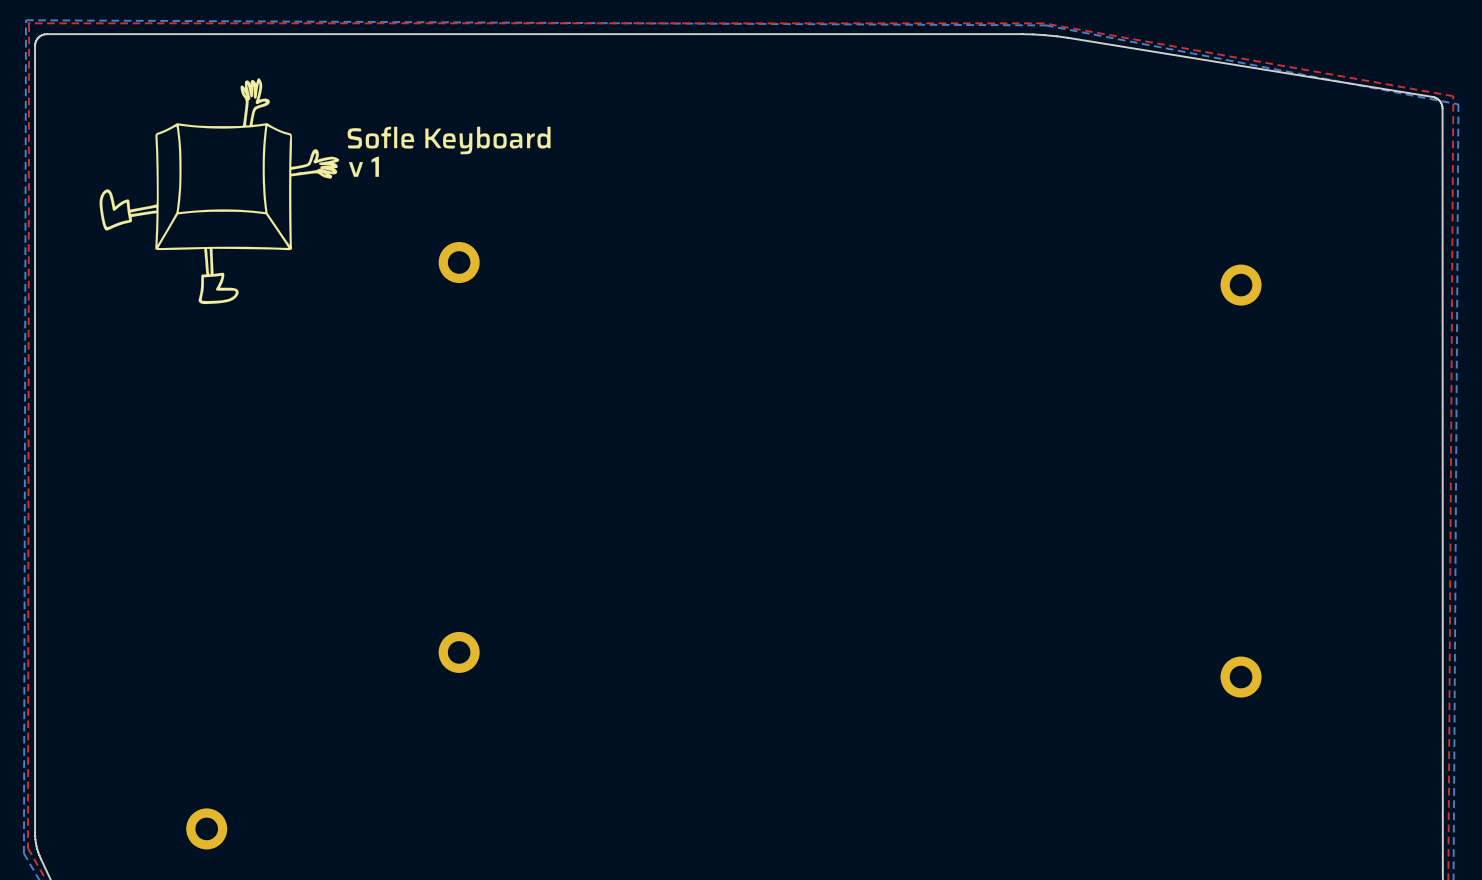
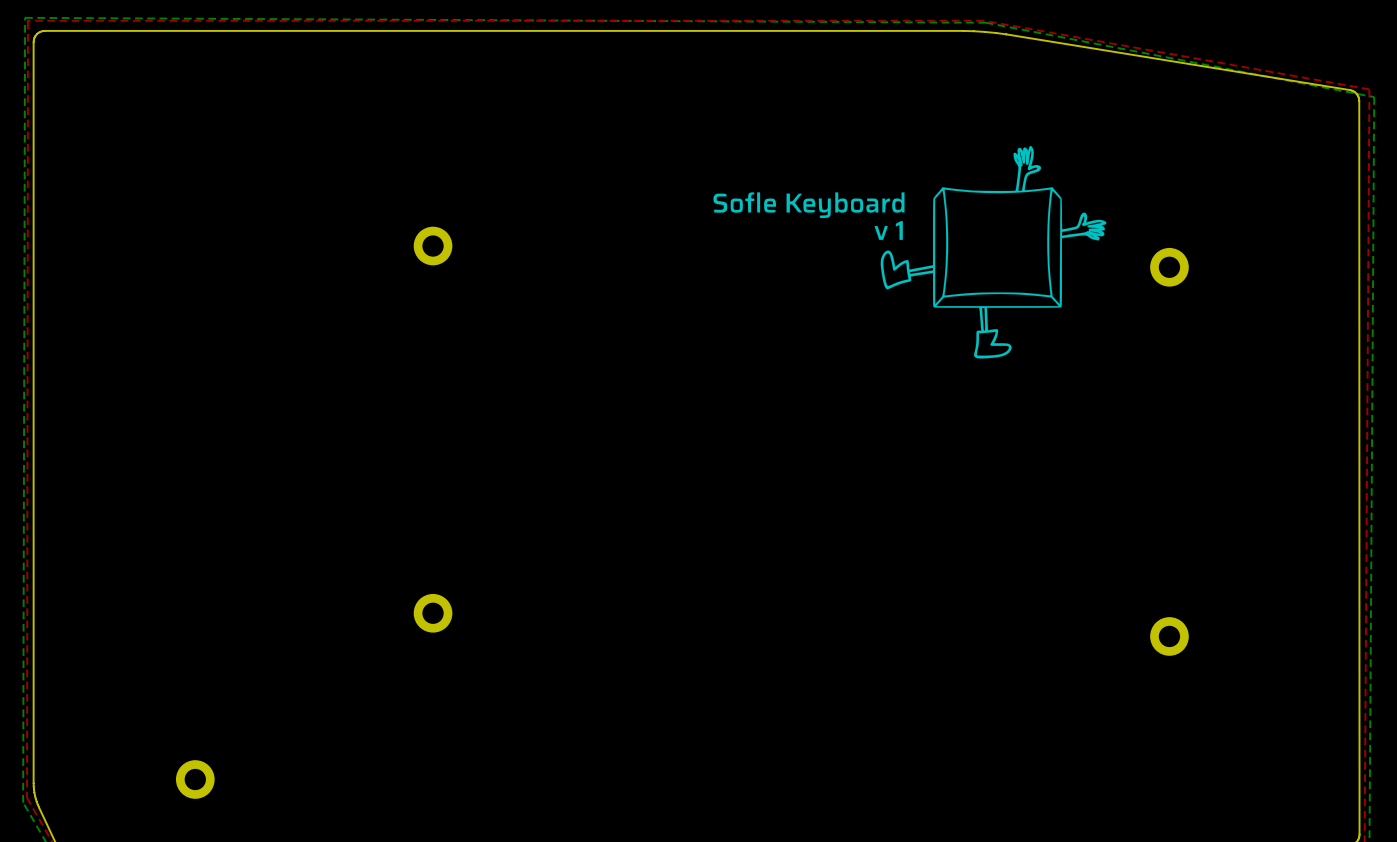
drawing: [99, 78, 551, 305] -> none
drawing: none -> [713, 145, 1107, 359]

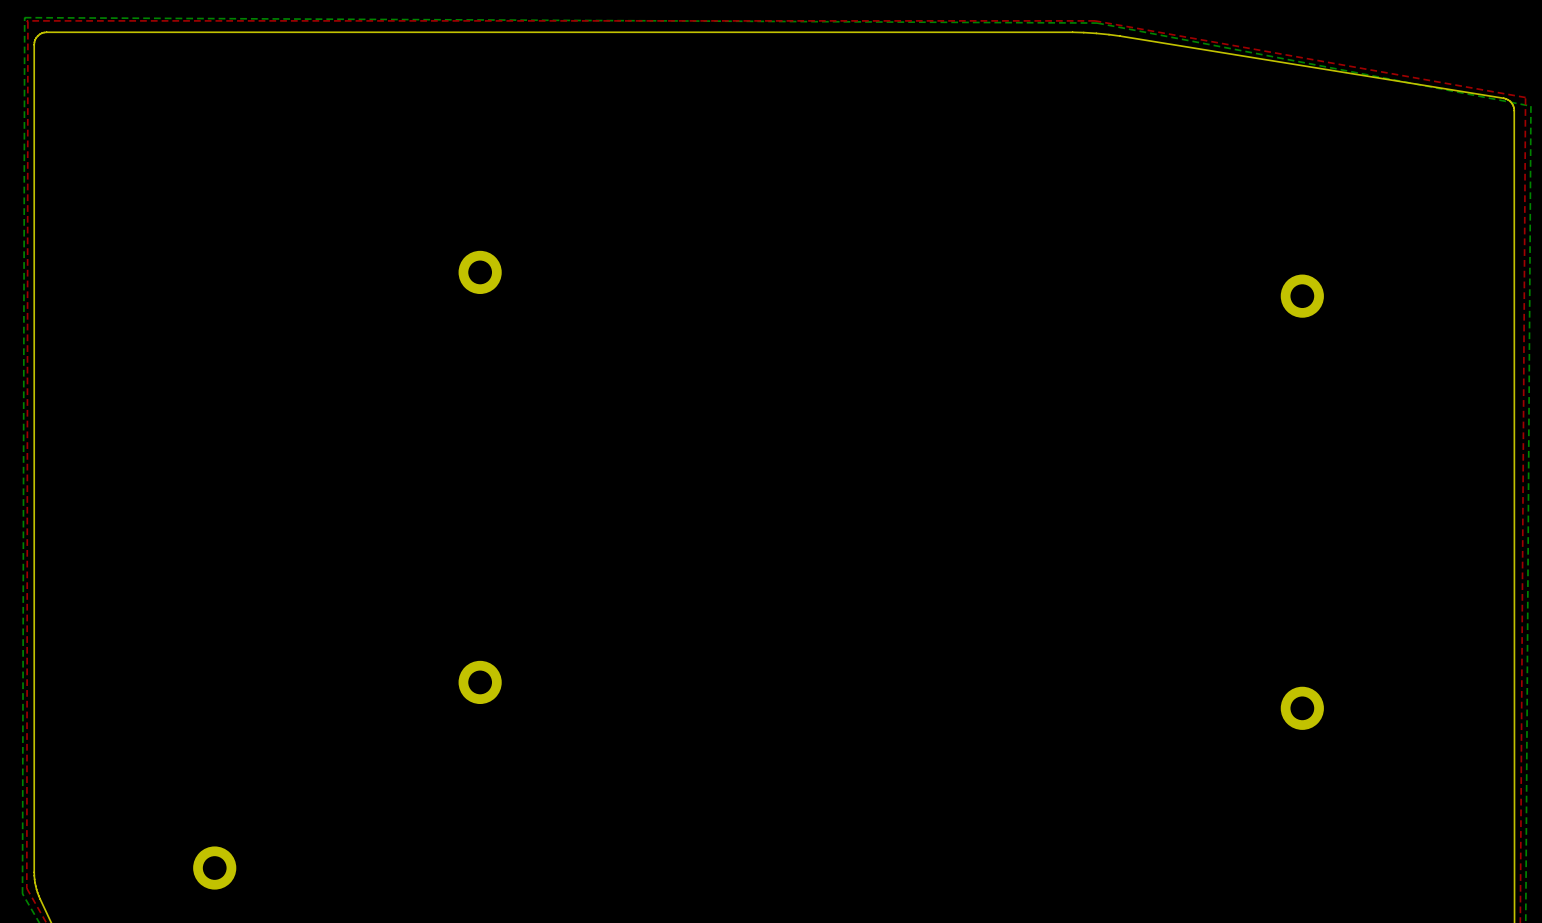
drawing: [713, 145, 1107, 359] -> none

